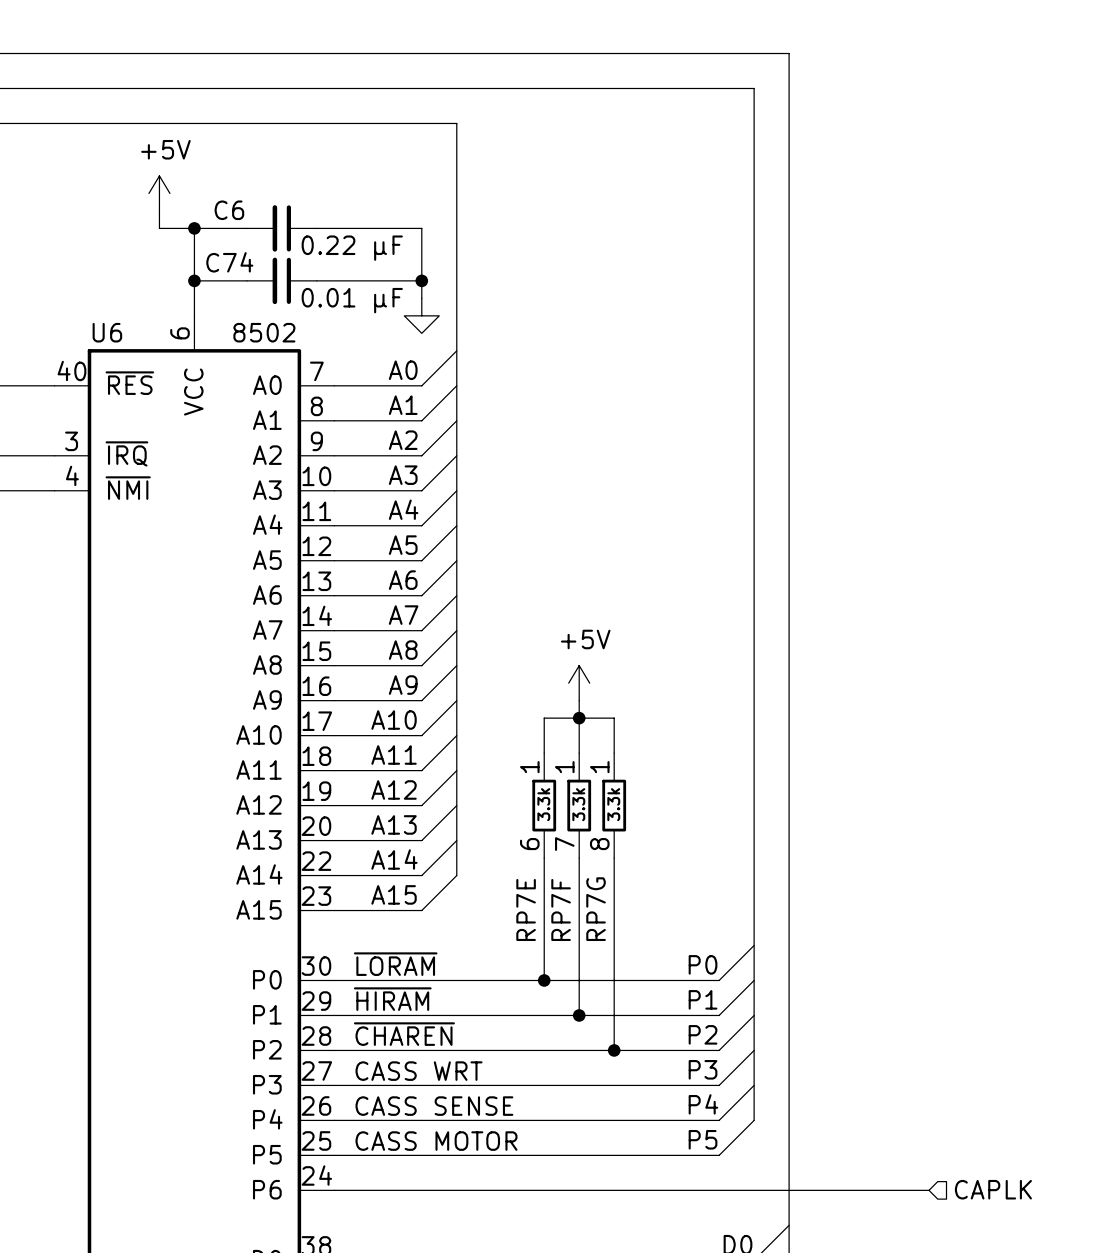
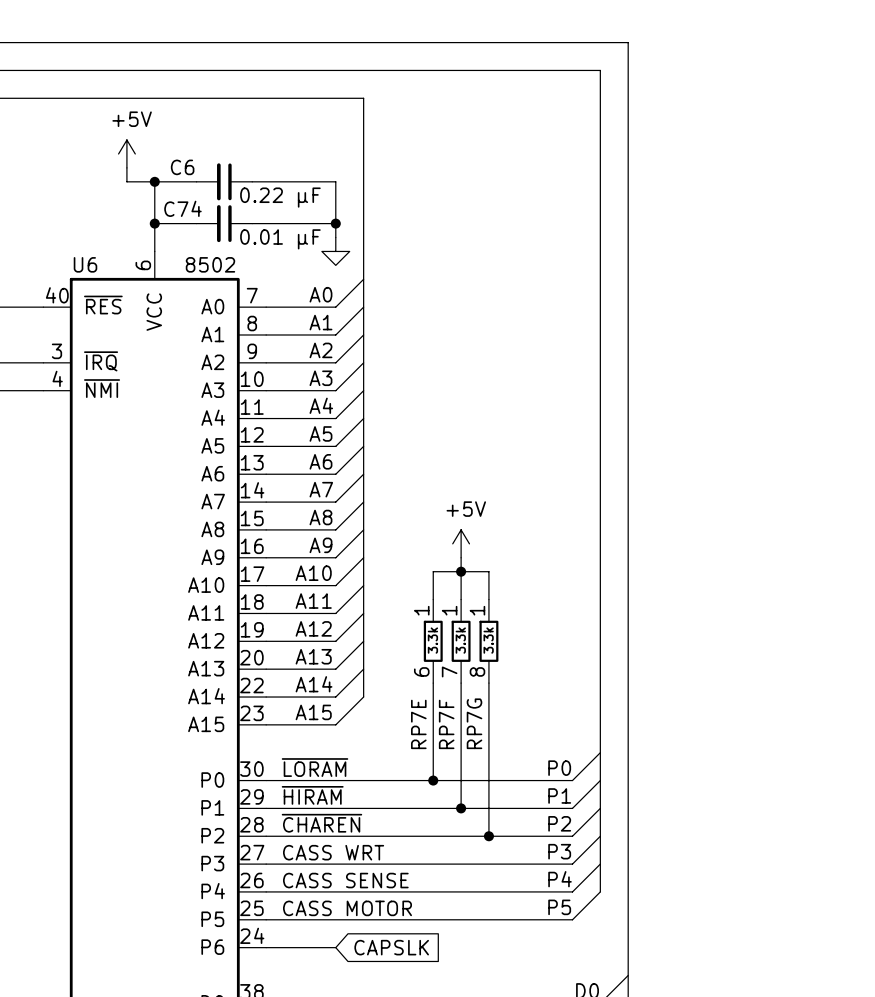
hierarchical label: CAPLK (993, 1189) -> none
wire: (421, 1190) (929, 1190) -> none
global label: none -> CAPSLK (391, 947)

